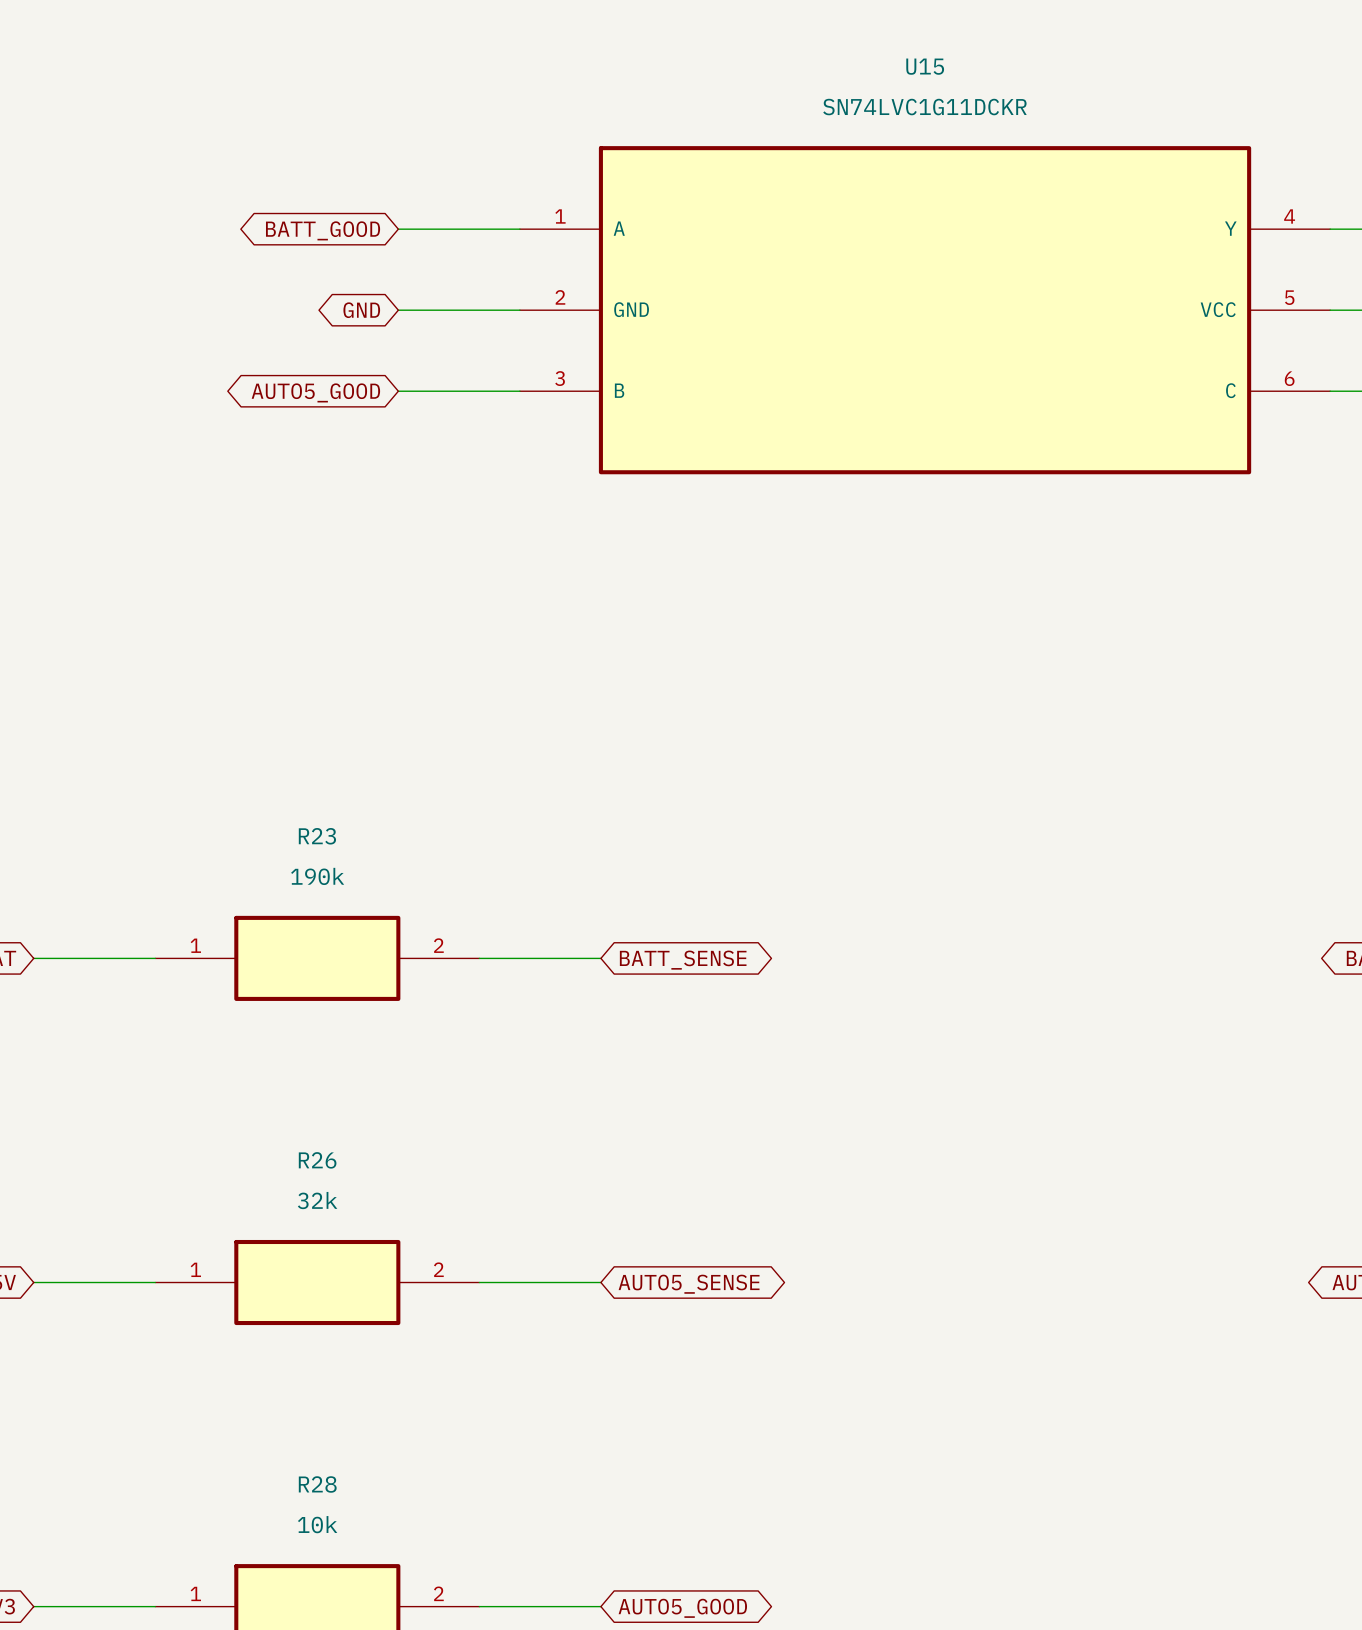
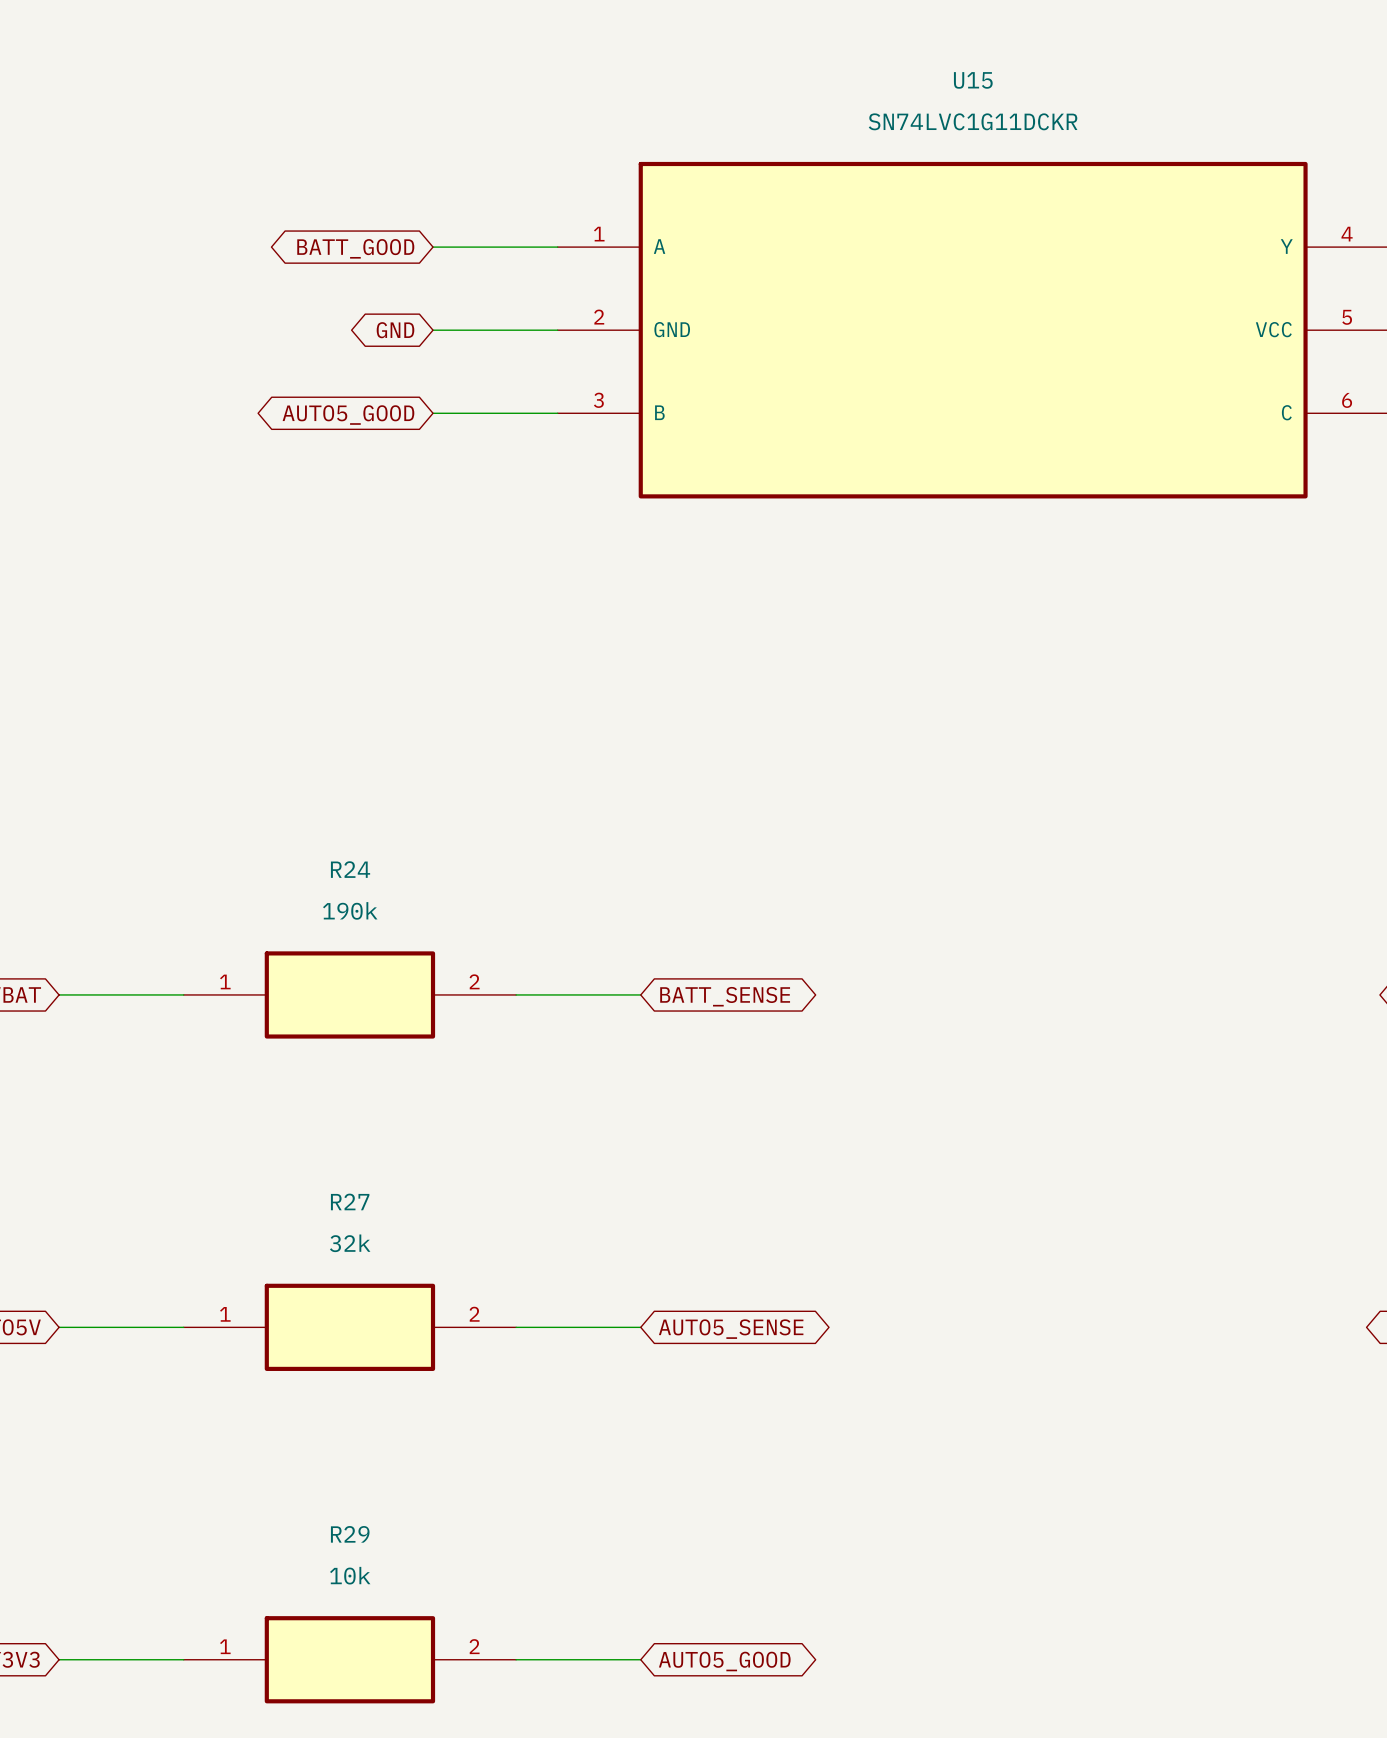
R23 name: R23 (317, 836) -> R24 (350, 869)
R26 name: R26 (317, 1160) -> R27 (350, 1201)
R28 name: R28 (317, 1484) -> R29 (350, 1534)

